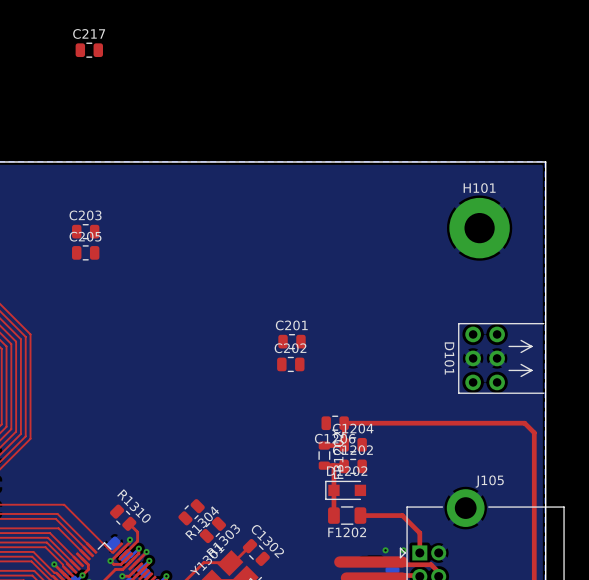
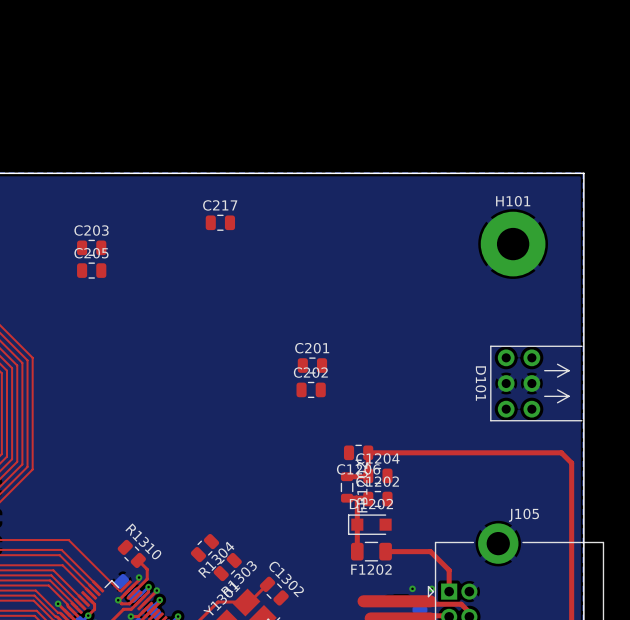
C217 position: (89, 50) -> (220, 222)

